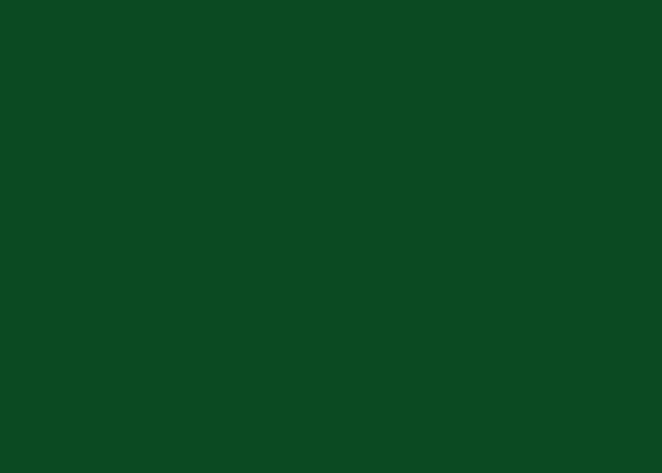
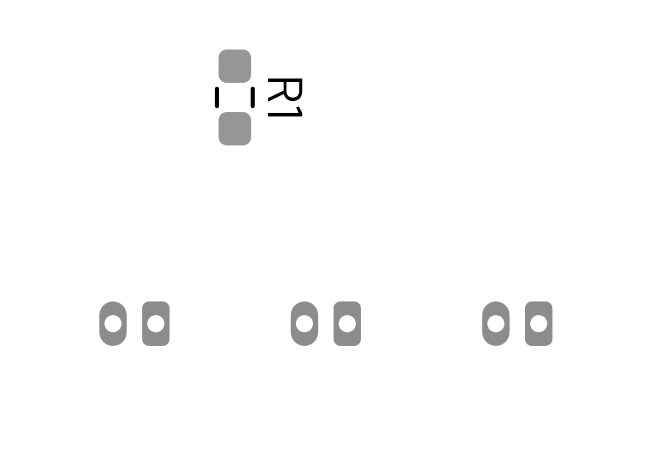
R1: none -> (234, 97)
part: none -> (134, 323)
part: none -> (325, 323)
part: none -> (517, 323)

